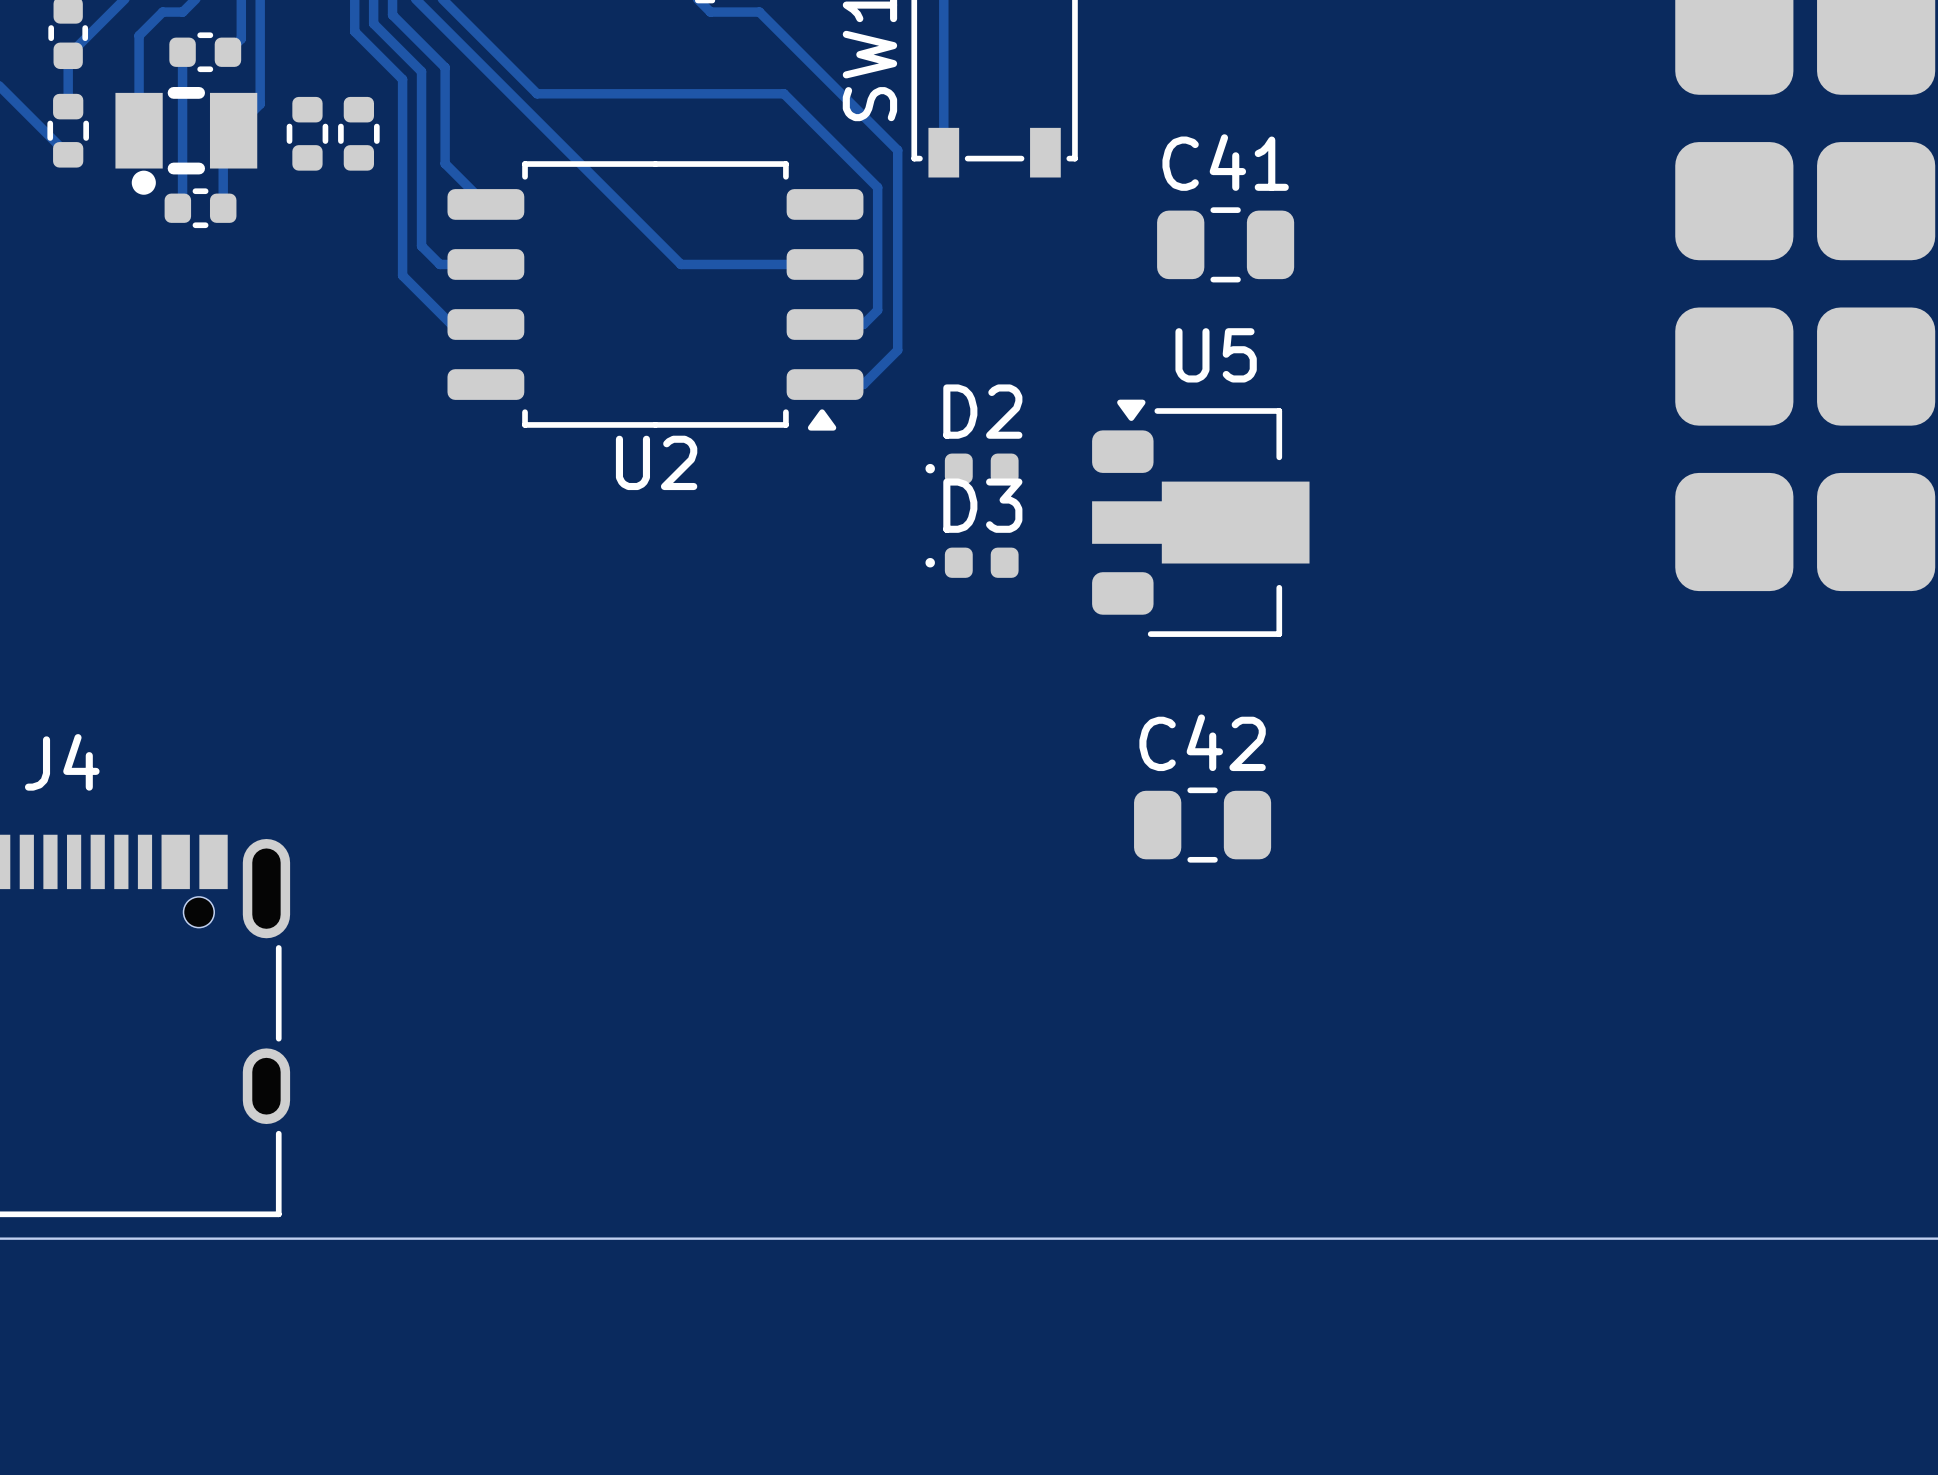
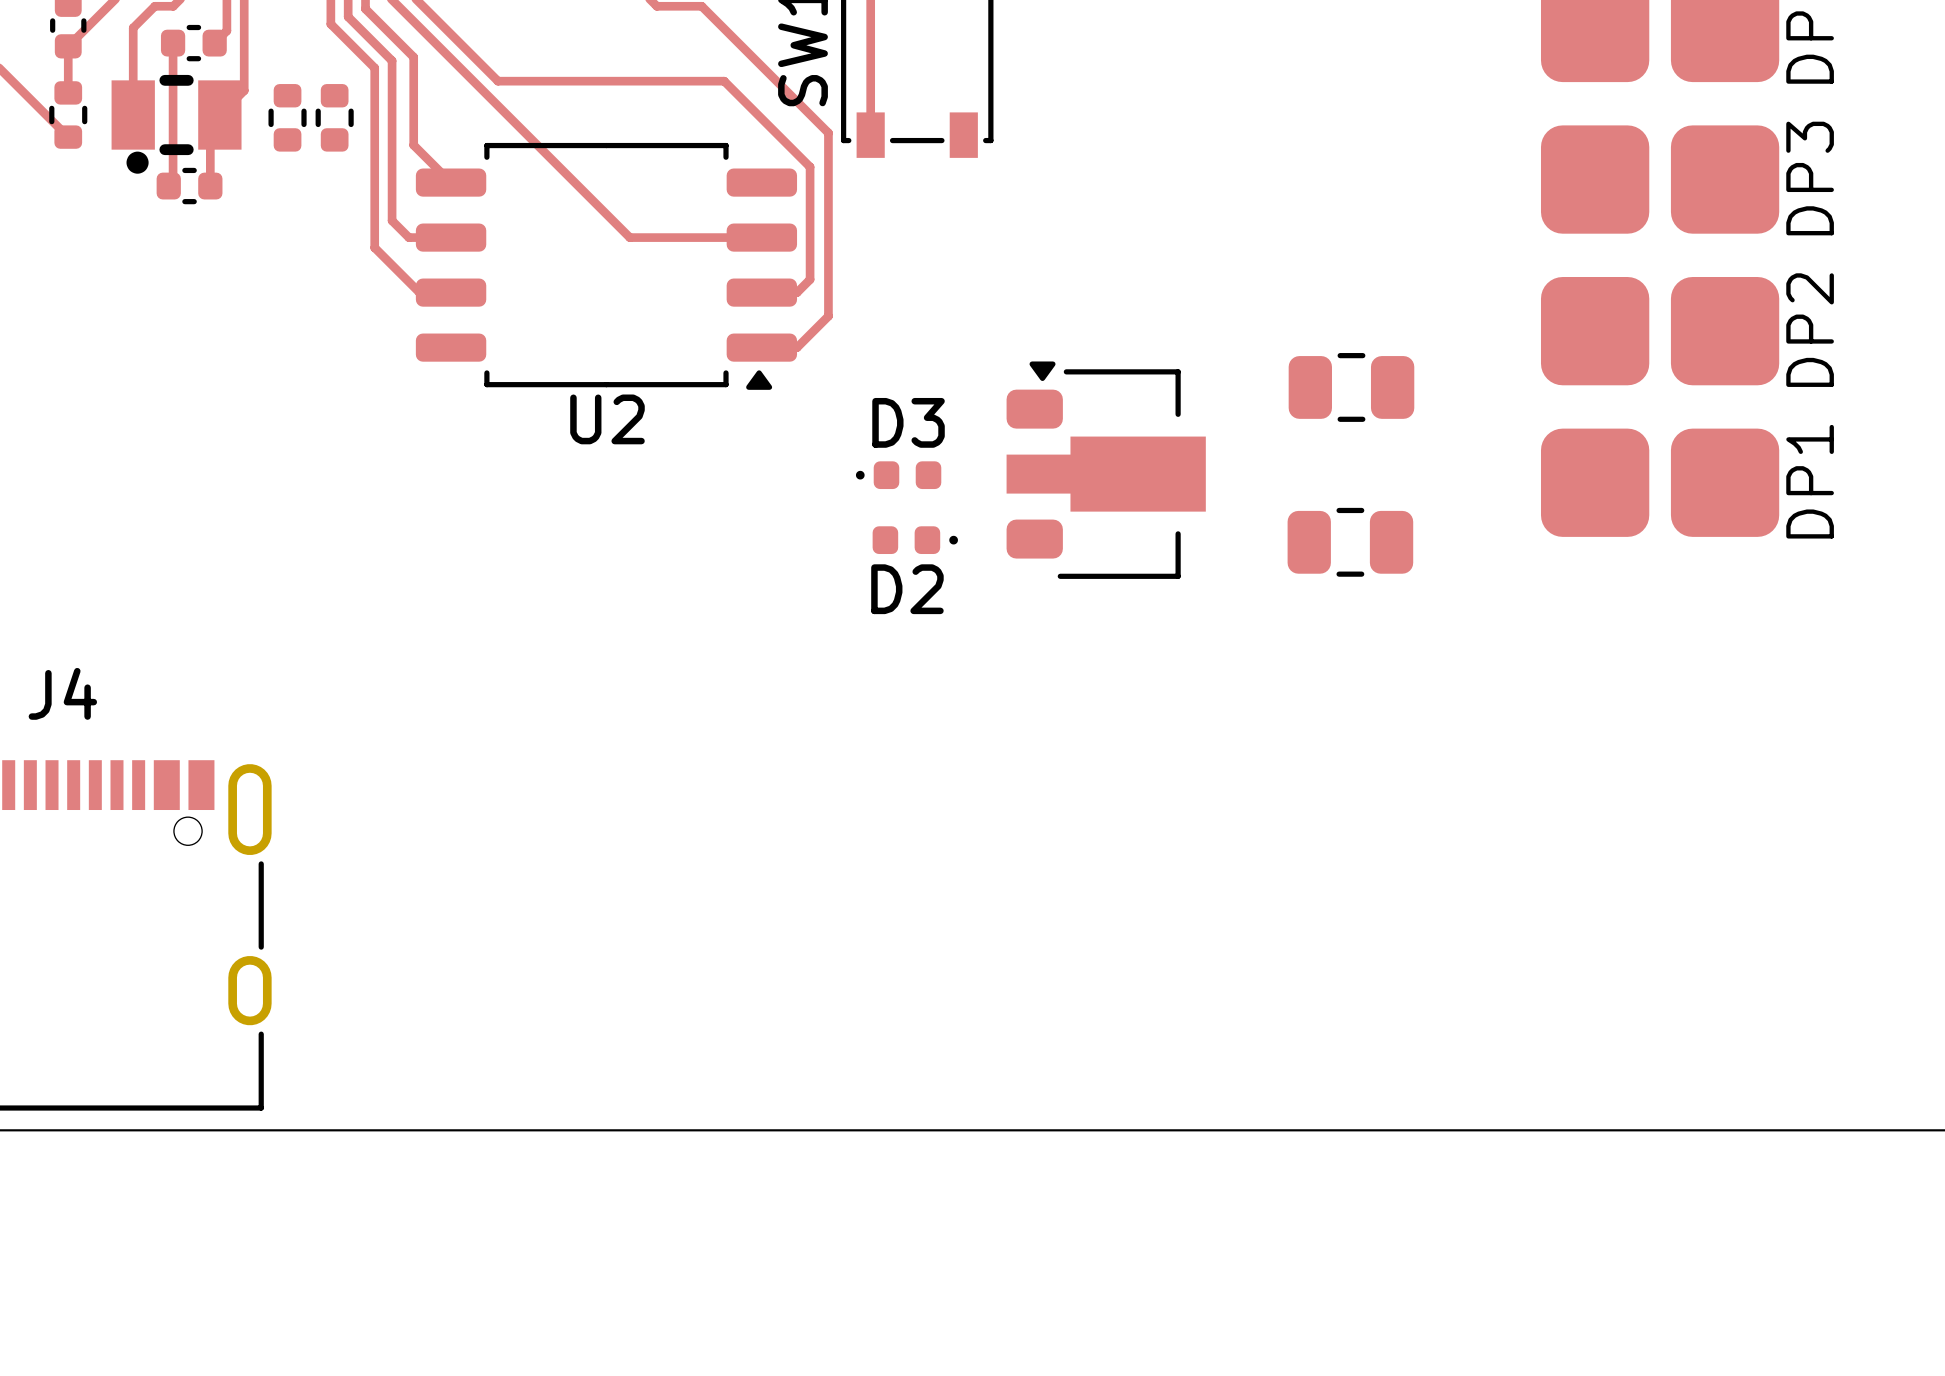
C41: (1225, 244) -> none
U5 name: U5 (1216, 355) -> none
part: none -> (1351, 387)
D2 rotation: 0° (972, 468) -> 180° (915, 540)
D2 position: (972, 468) -> (915, 540)
D3 position: (972, 562) -> (898, 475)
part: none -> (1350, 542)
C42: (1202, 825) -> none

